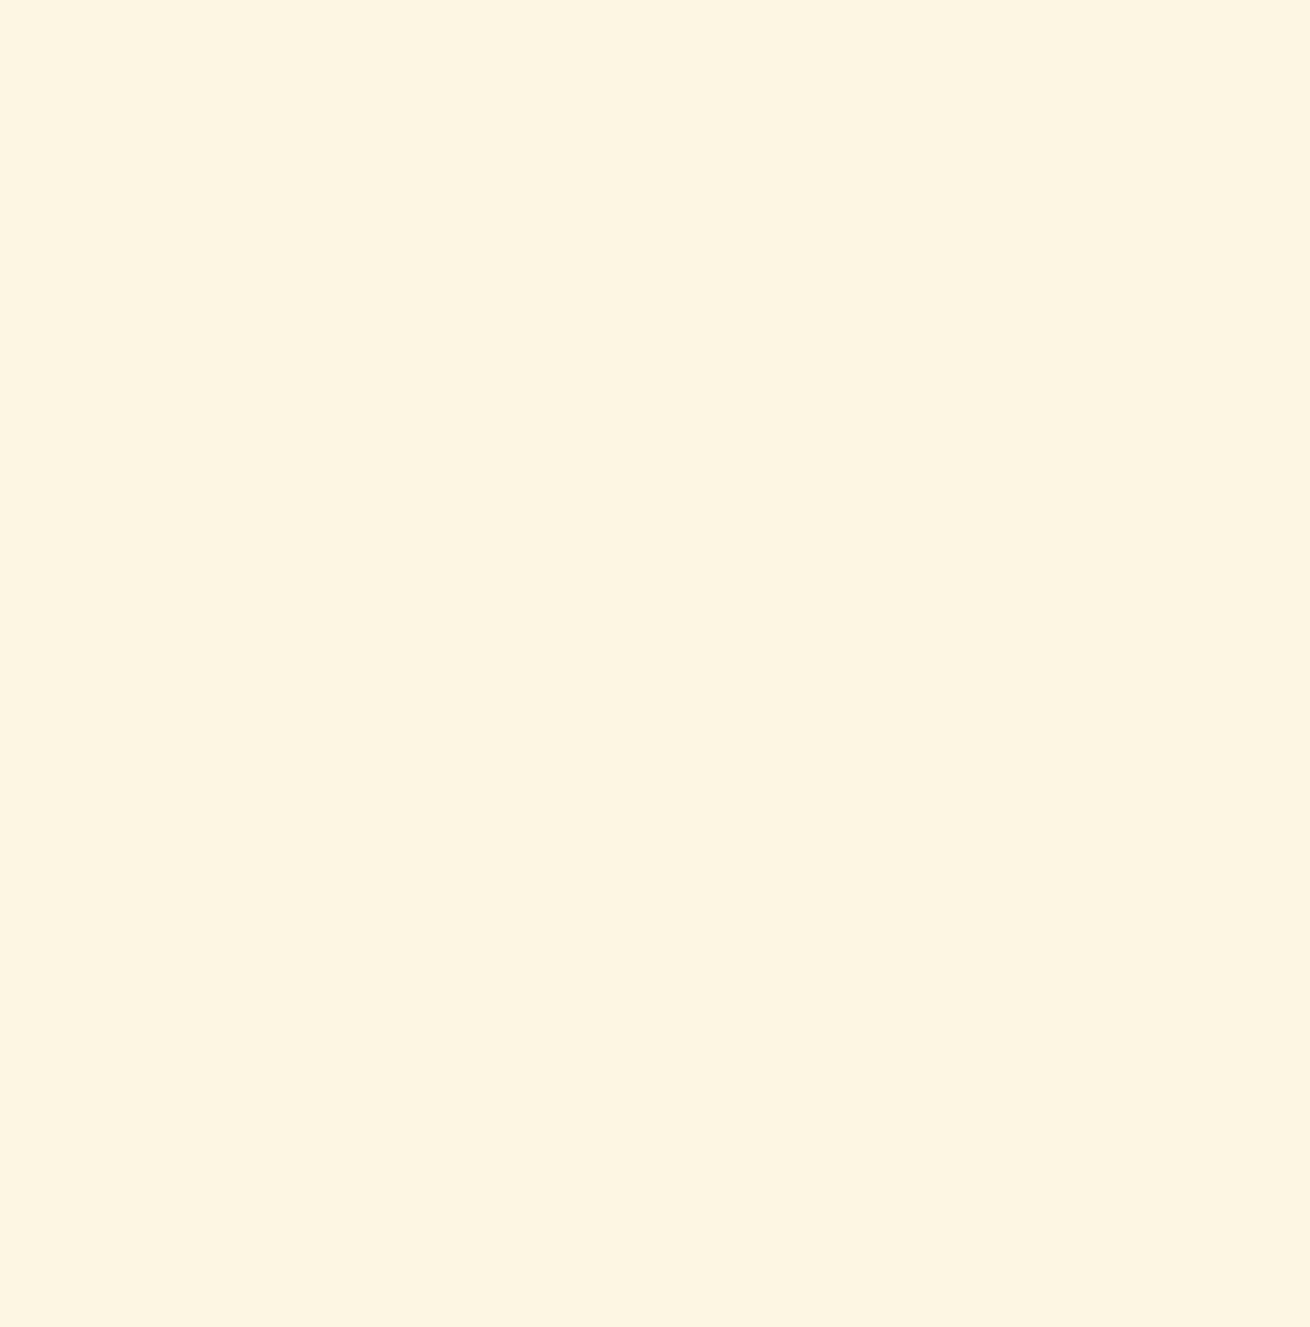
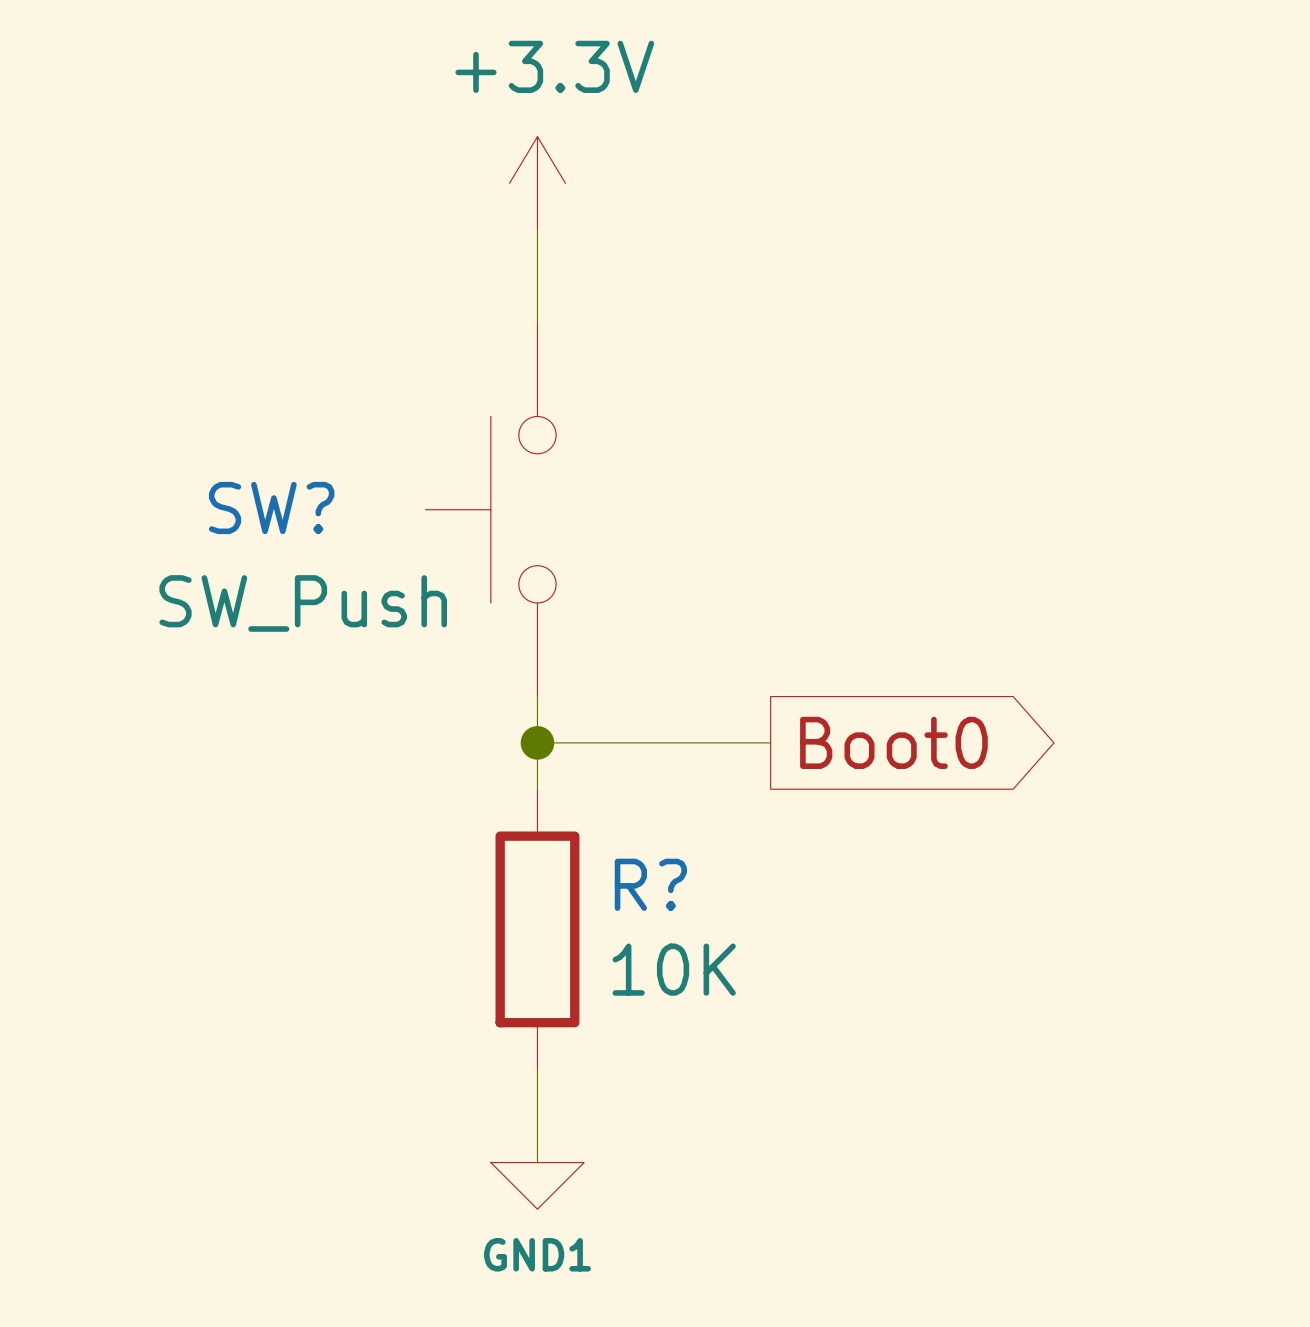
power symbol: none -> +3.3V (537, 183)
wire: none -> (537, 229) (537, 323)
SW?: none -> SW_Push (490, 509)
wire: none -> (537, 696) (537, 789)
wire: none -> (537, 742) (770, 742)
junction: none -> (537, 742)
global label: none -> Boot0 (893, 742)
R?: none -> 10K (537, 929)
wire: none -> (537, 1069) (537, 1162)
power symbol: none -> GND1 (537, 1185)

